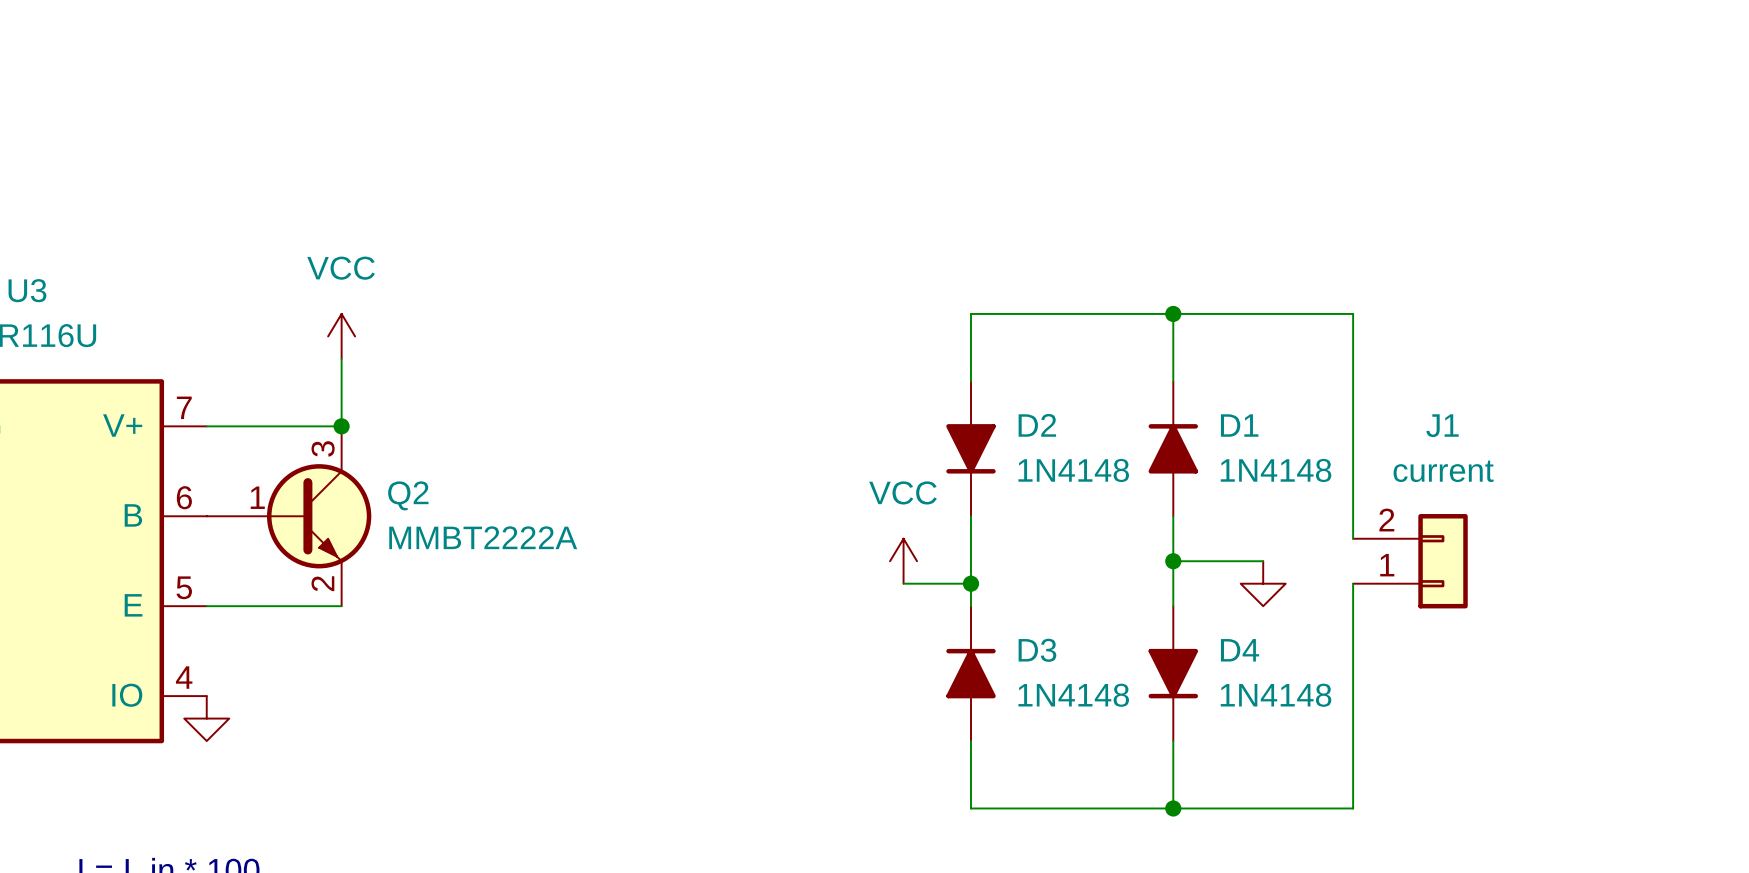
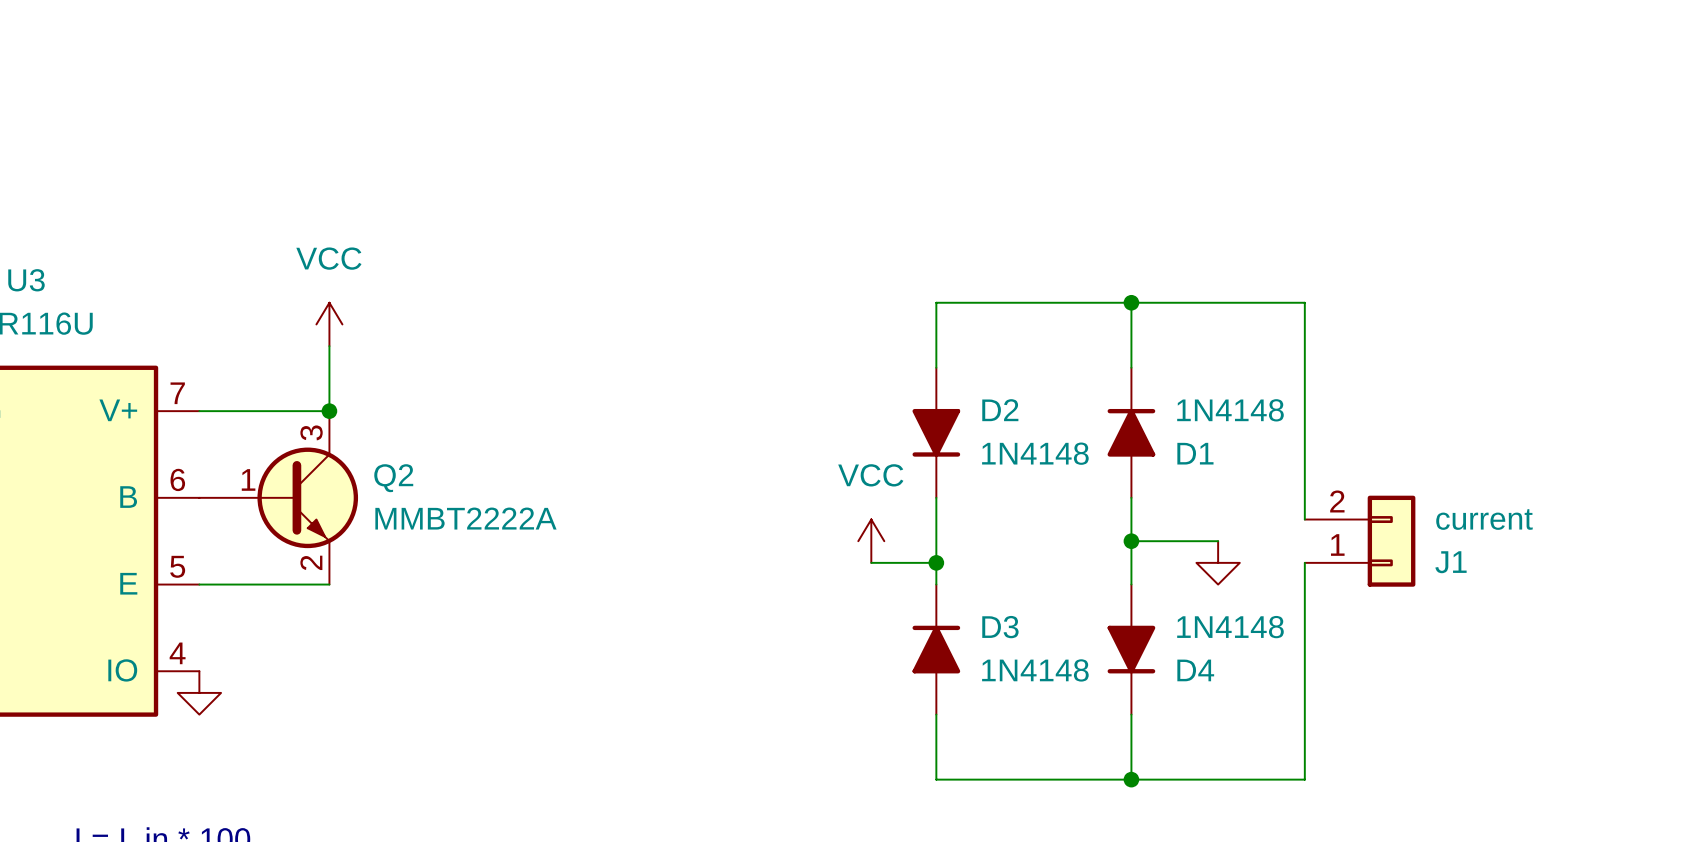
D1 name position: D1 (1239, 425) -> D1 (1195, 453)
J1 name position: J1 (1442, 425) -> J1 (1451, 562)
D1 value position: 1N4148 (1276, 470) -> 1N4148 (1230, 410)
J1 value position: current (1443, 471) -> current (1484, 519)
D4 name position: D4 (1239, 650) -> D4 (1195, 670)
D4 value position: 1N4148 (1276, 695) -> 1N4148 (1230, 627)

